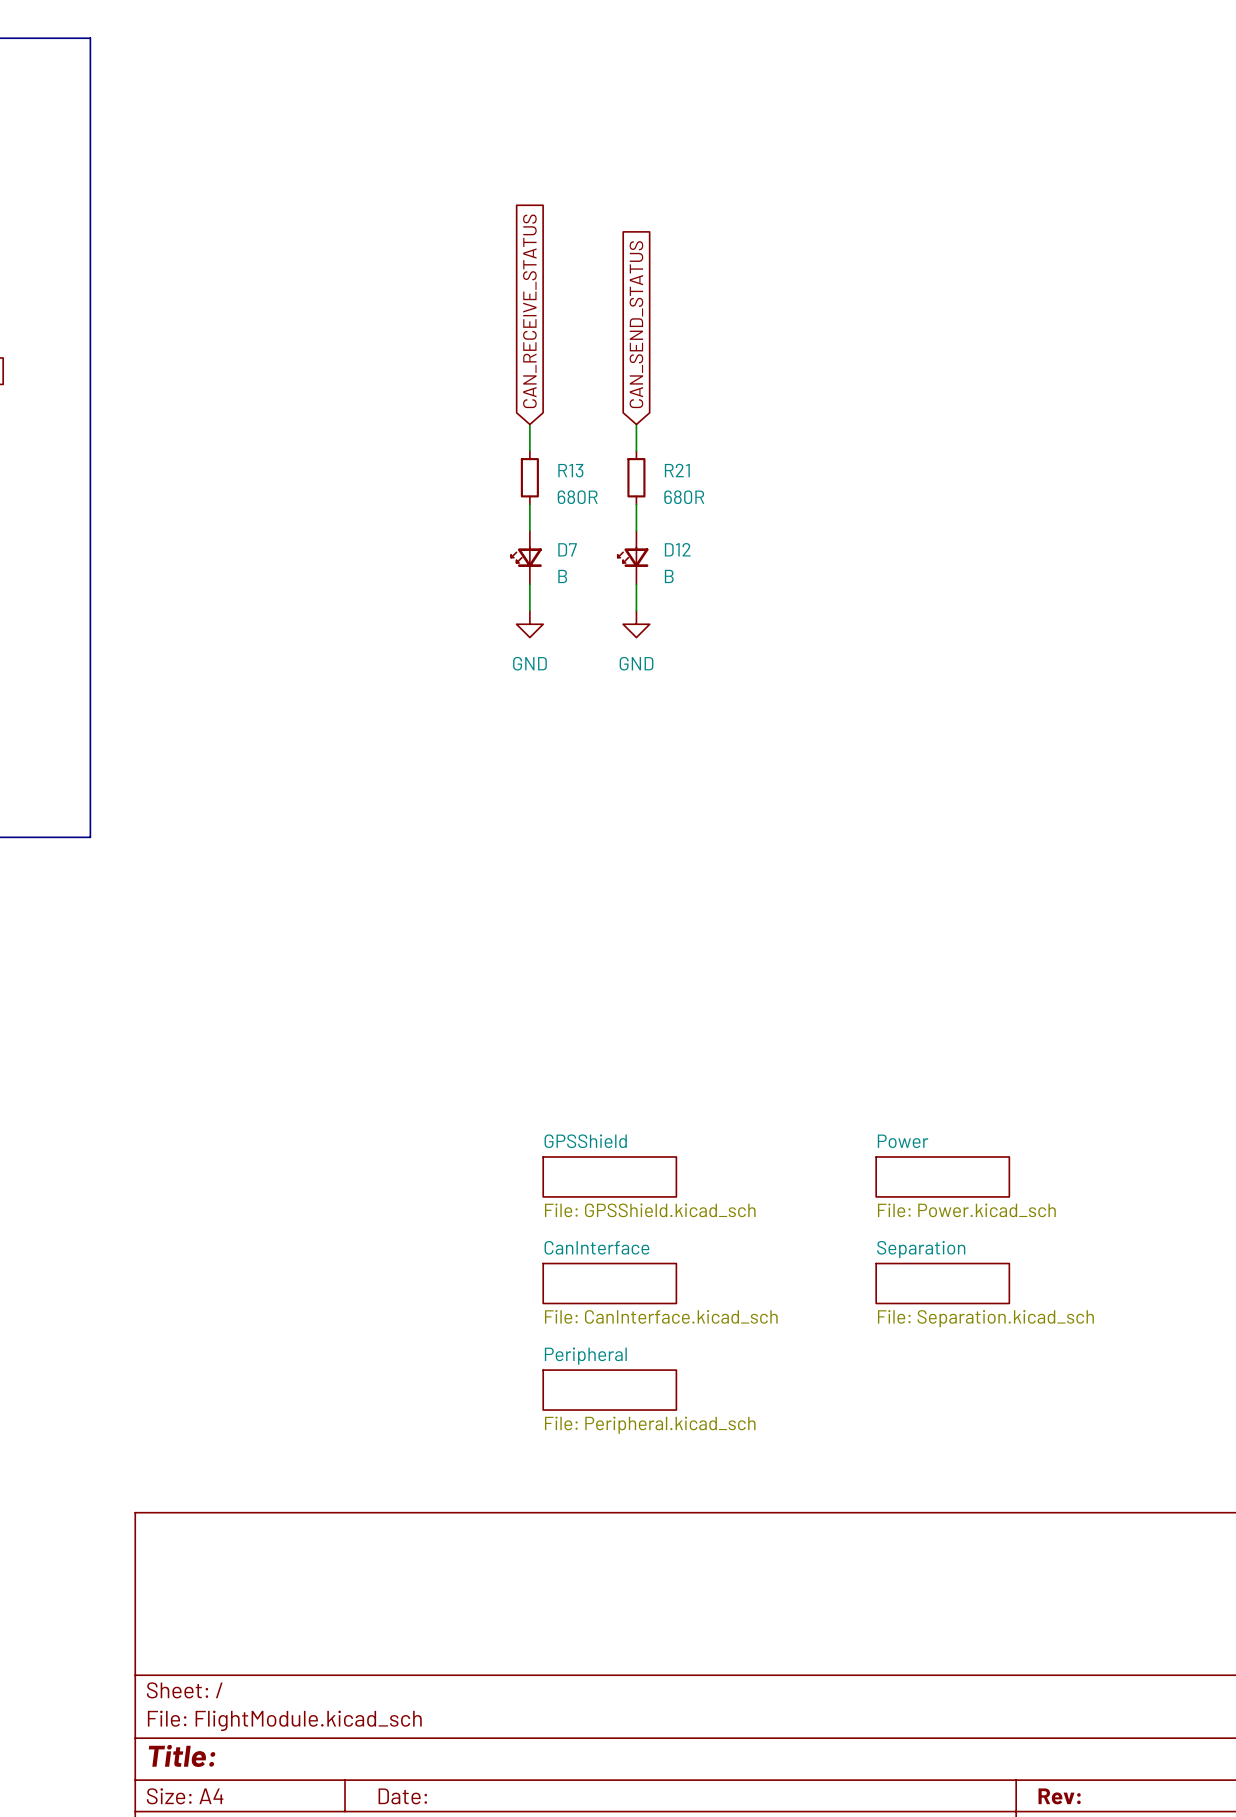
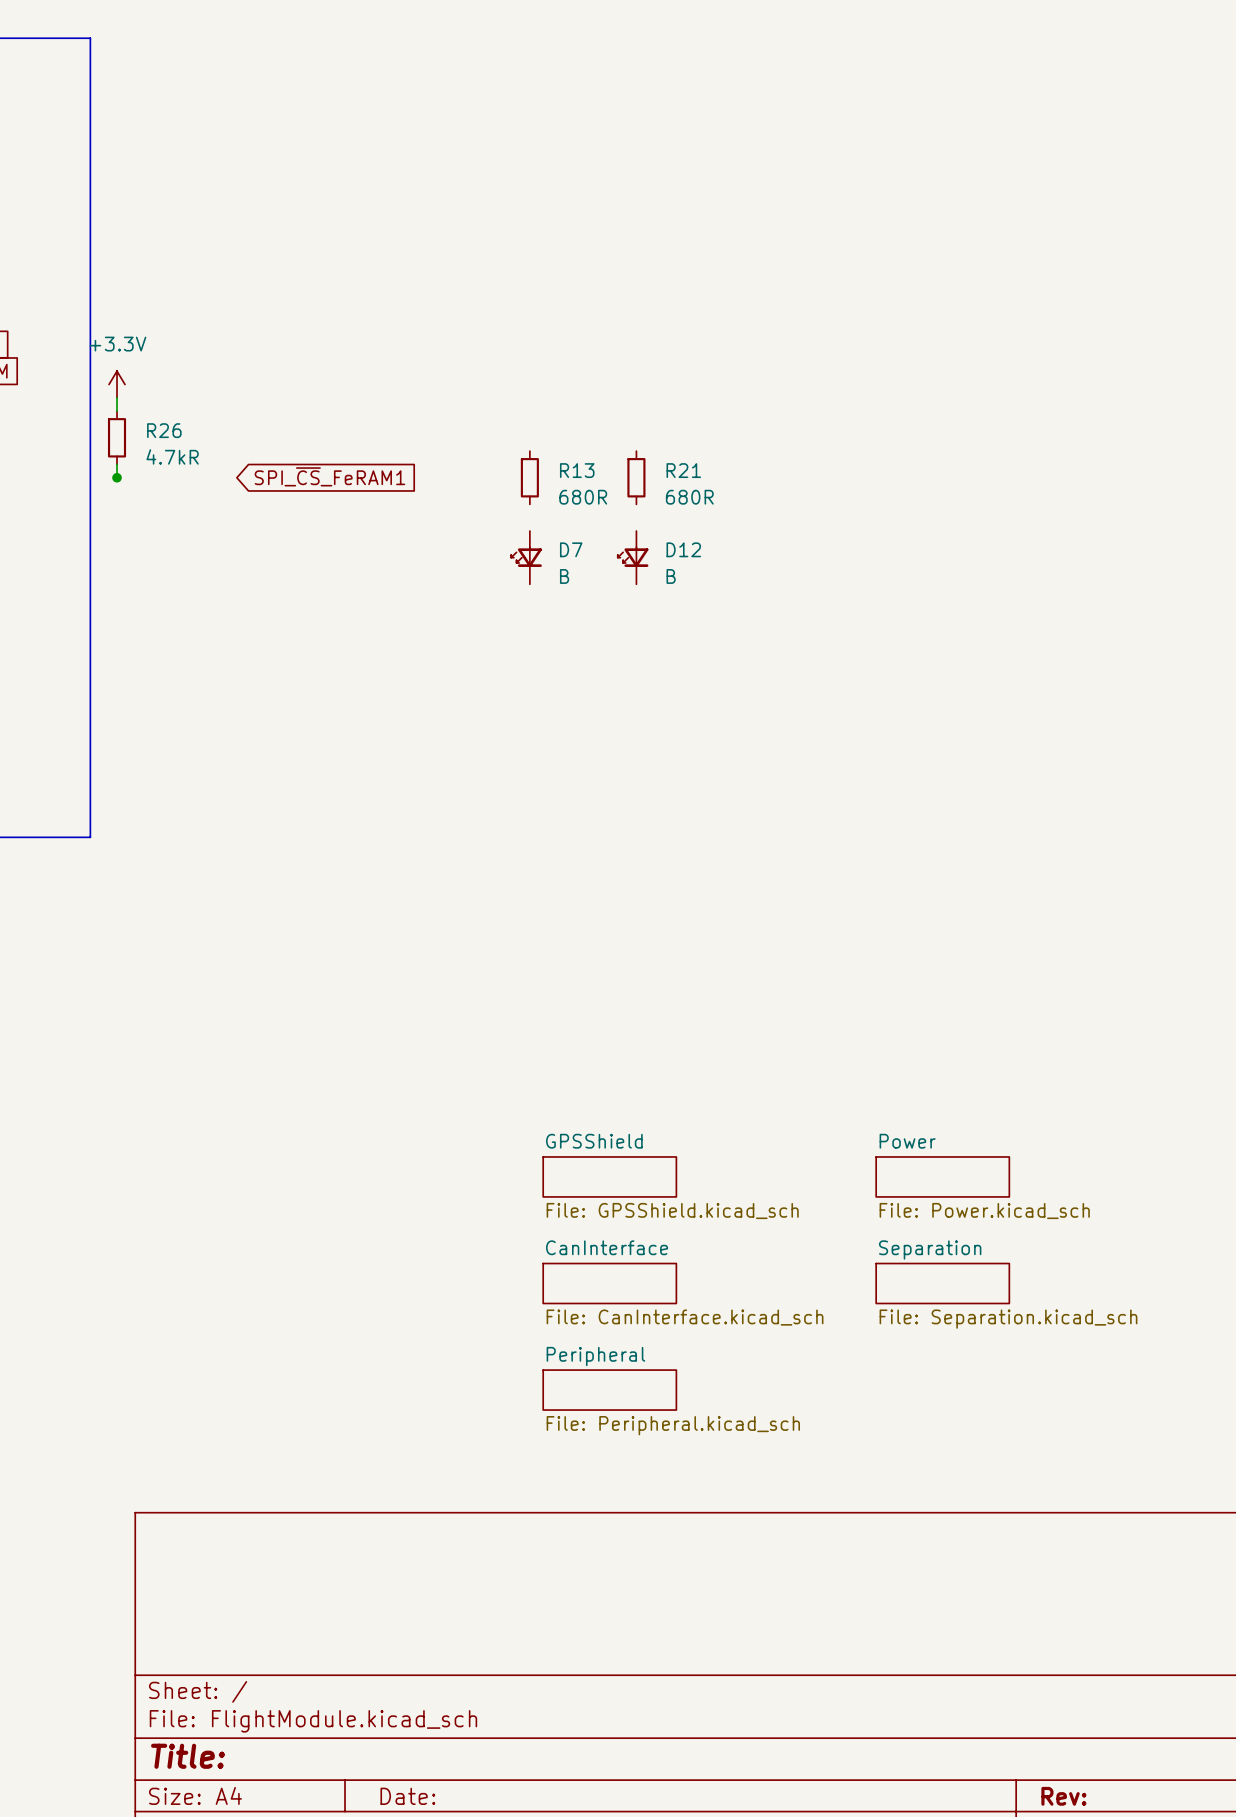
global label: CAN_RECEIVE_STATUS (529, 311) -> none
global label: CAN_SEND_STATUS (636, 324) -> none
power symbol: none -> +3.3V (117, 384)
wire: none -> (117, 397) (117, 411)
wire: (529, 424) (529, 451) -> none
wire: (636, 424) (636, 451) -> none
R26: none -> 4.7kR (117, 437)
wire: none -> (117, 464) (117, 477)
global label: none -> SPI_~{CS}_FeRAM1 (329, 476)
junction: none -> (117, 477)
wire: (529, 504) (529, 531) -> none
wire: (636, 504) (636, 531) -> none
wire: (529, 584) (529, 610) -> none
wire: (636, 584) (636, 610) -> none
power symbol: GND (529, 624) -> none
power symbol: GND (636, 624) -> none

